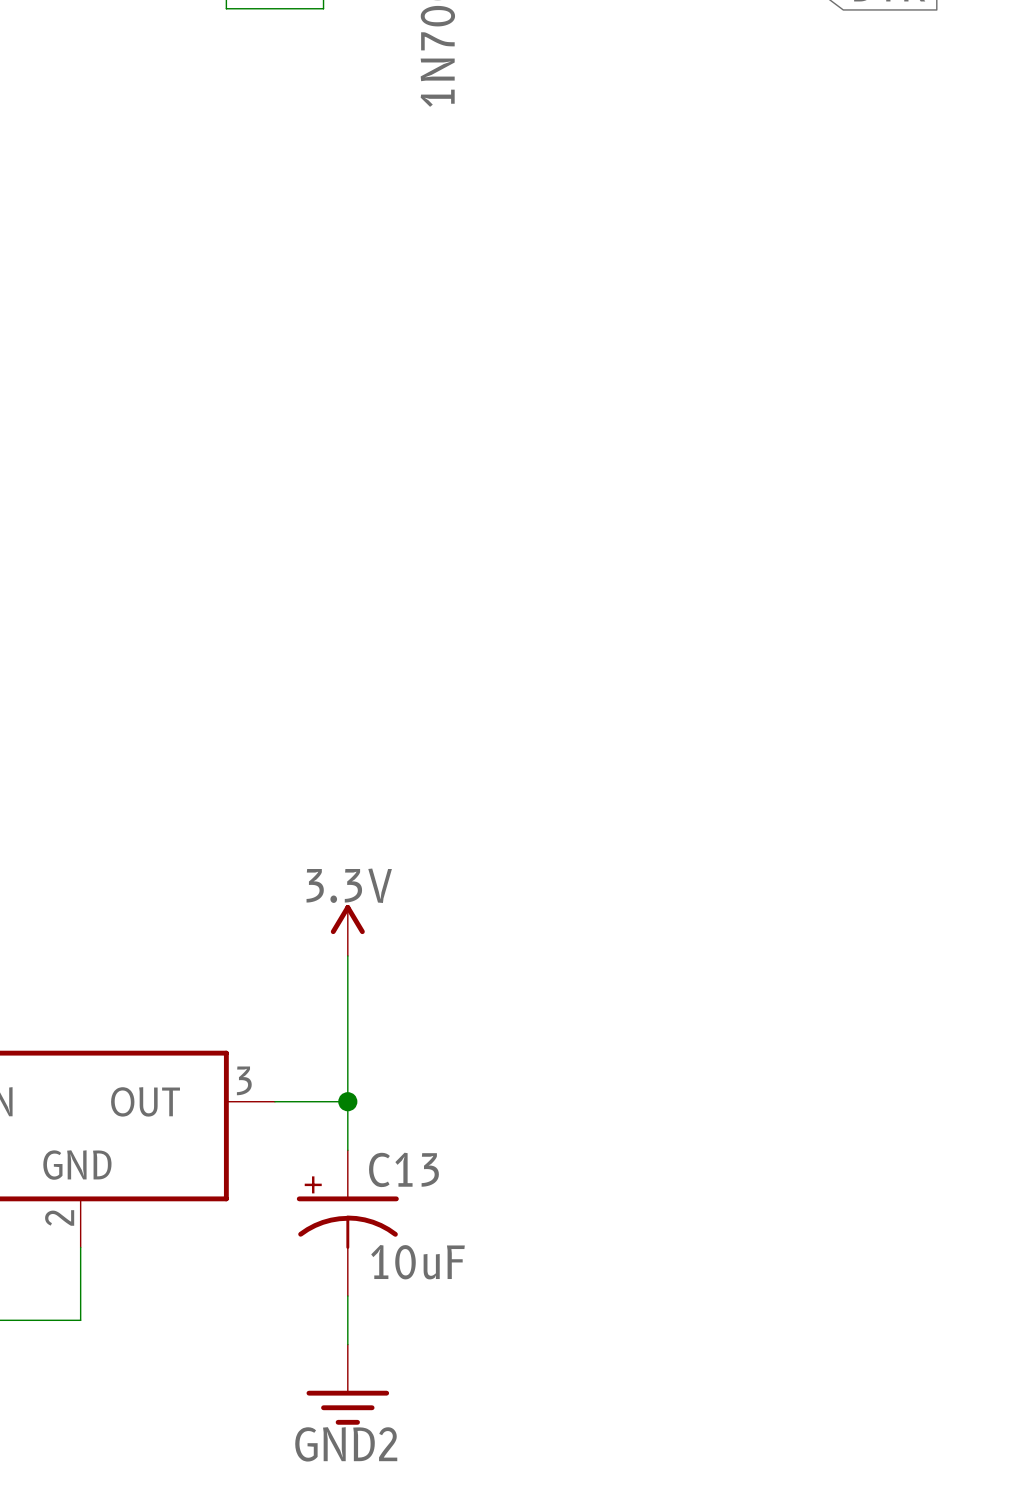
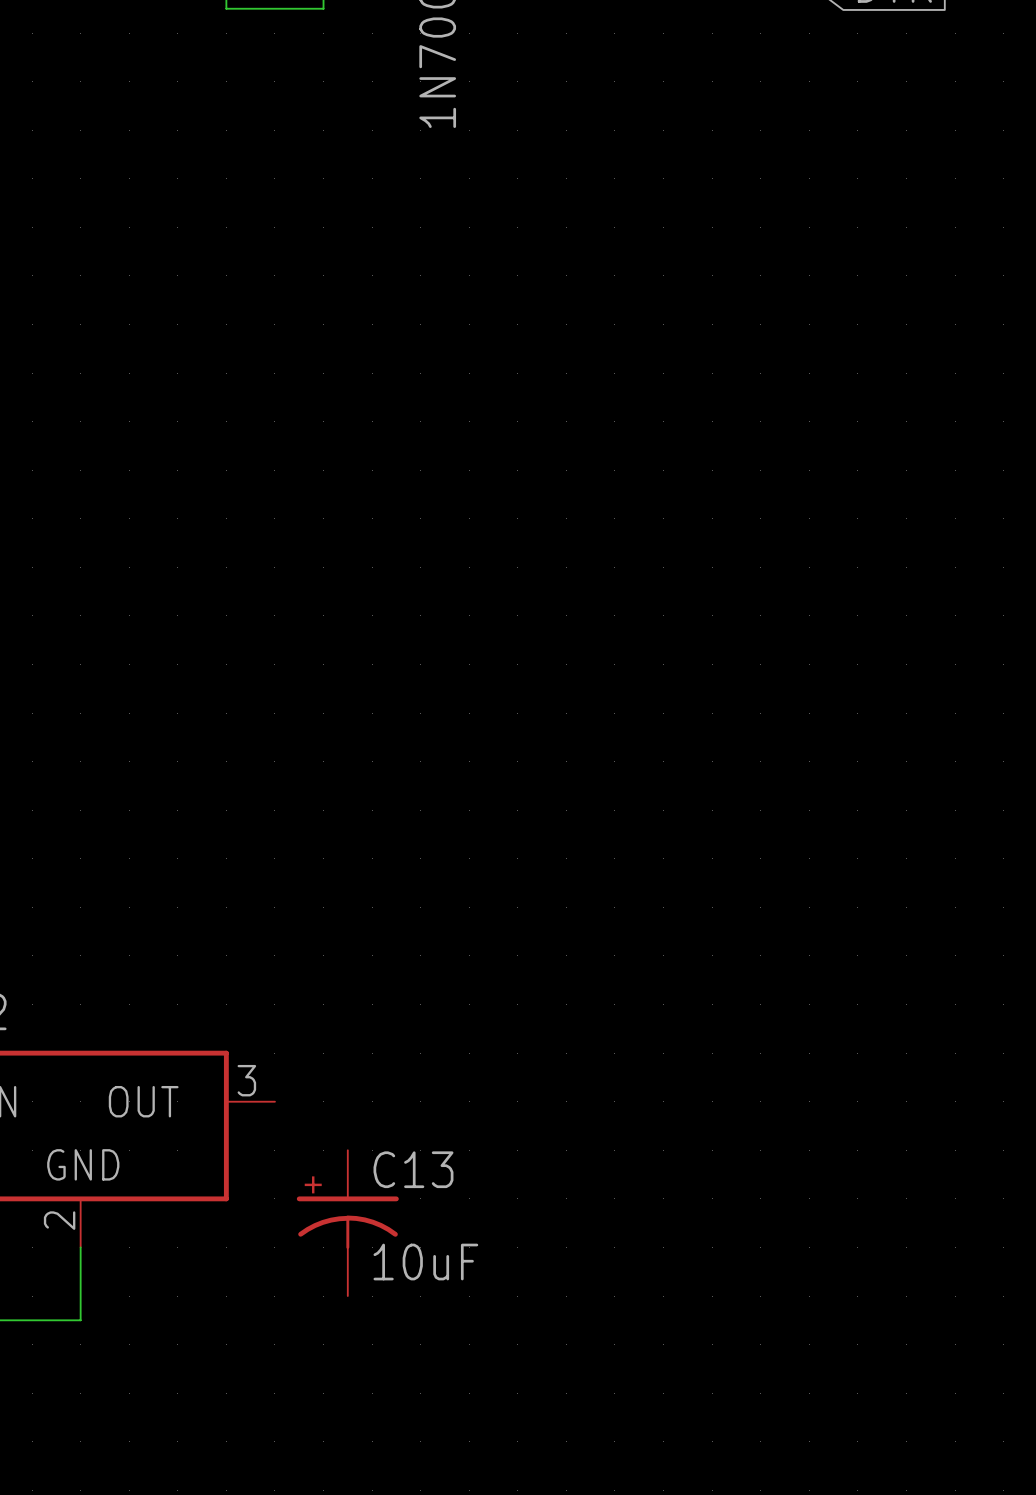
power symbol: 3.3V (347, 930) -> none
wire: (347, 955) (347, 1150) -> none
wire: (274, 1101) (347, 1101) -> none
junction: (347, 1101) -> none
wire: (347, 1296) (347, 1344) -> none
power symbol: GND2 (347, 1384) -> none

